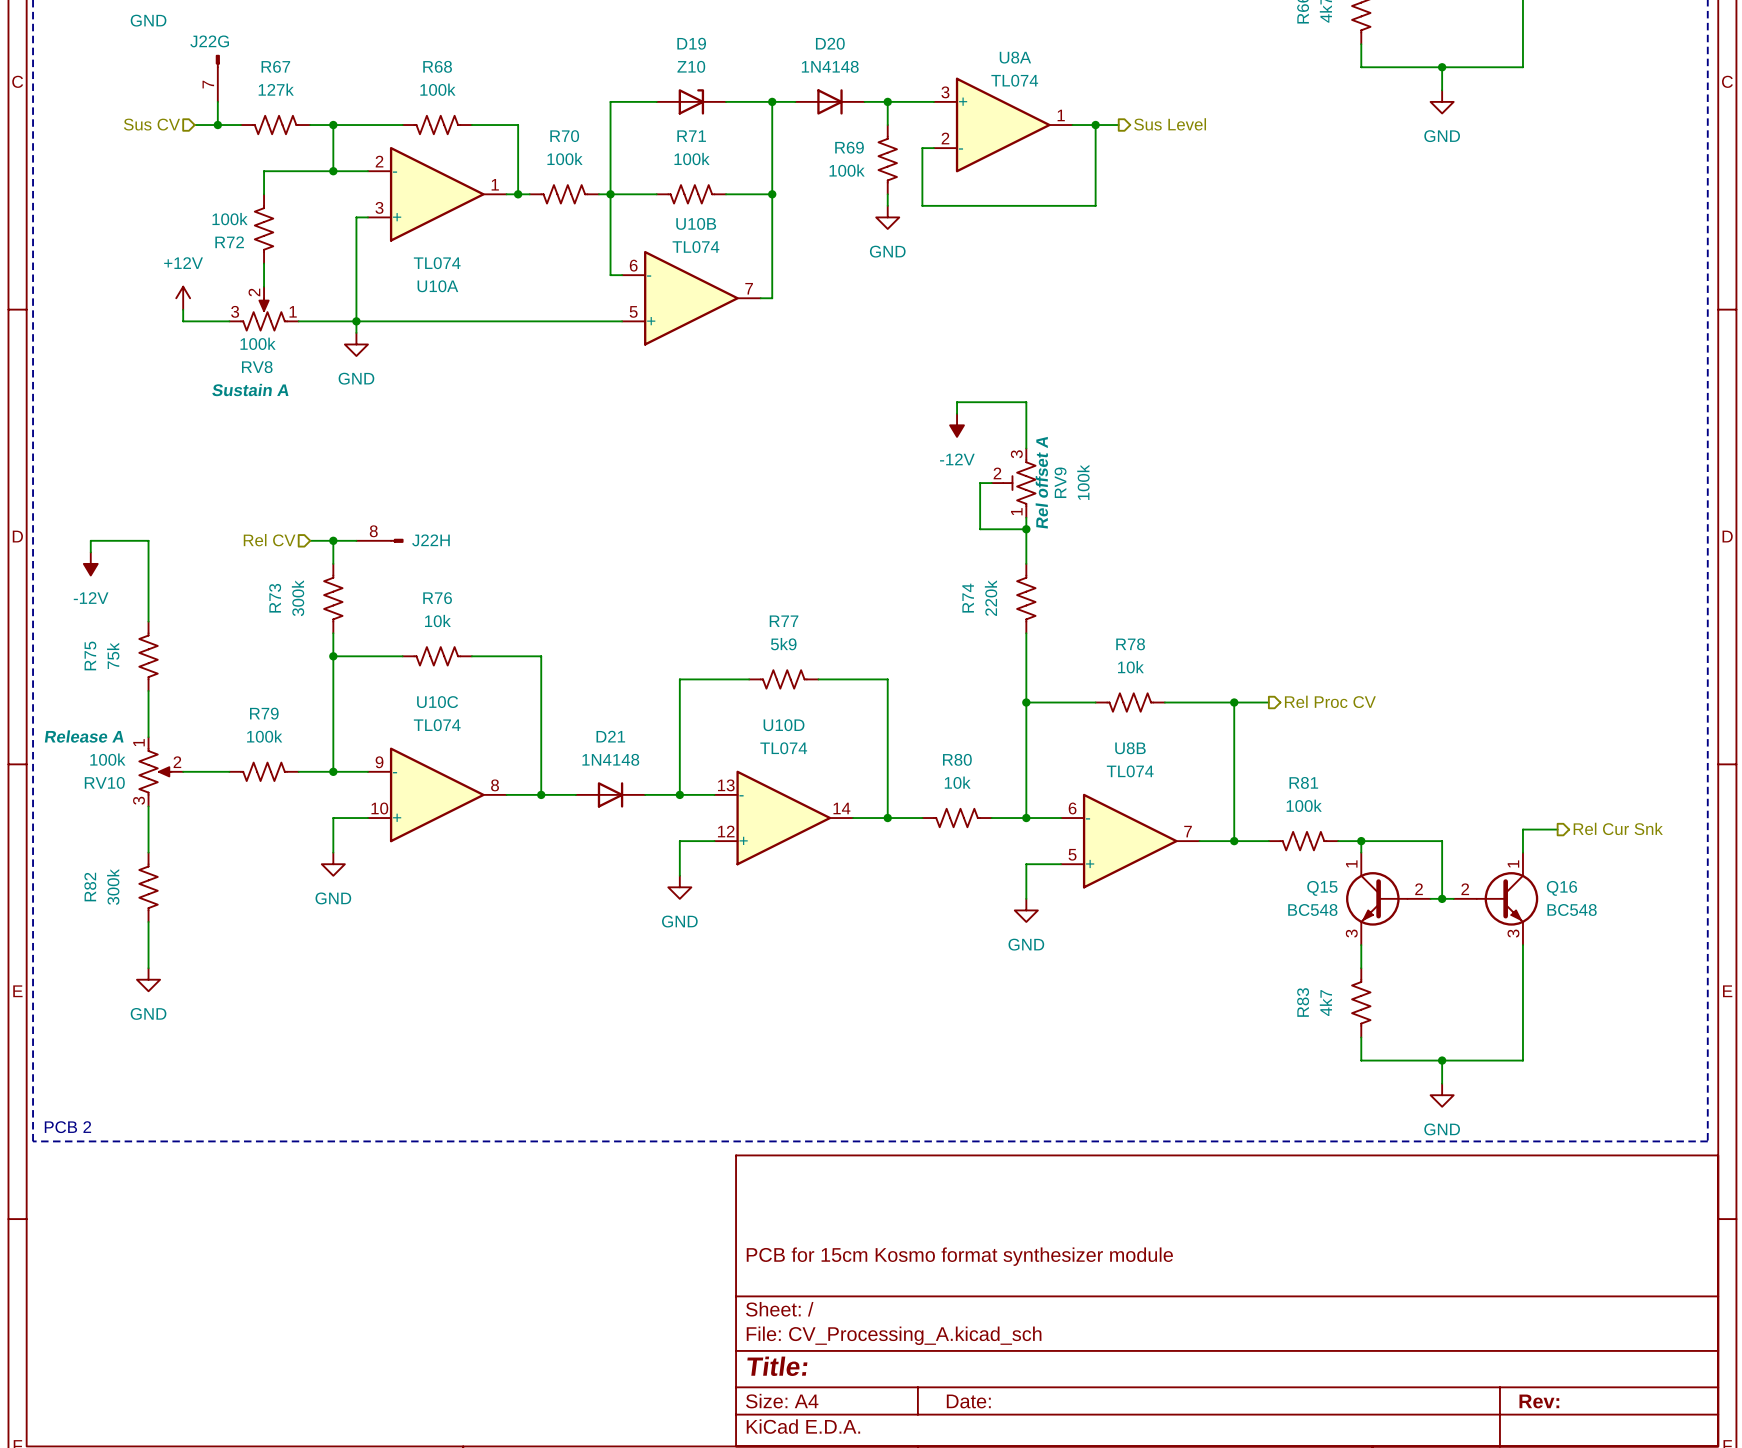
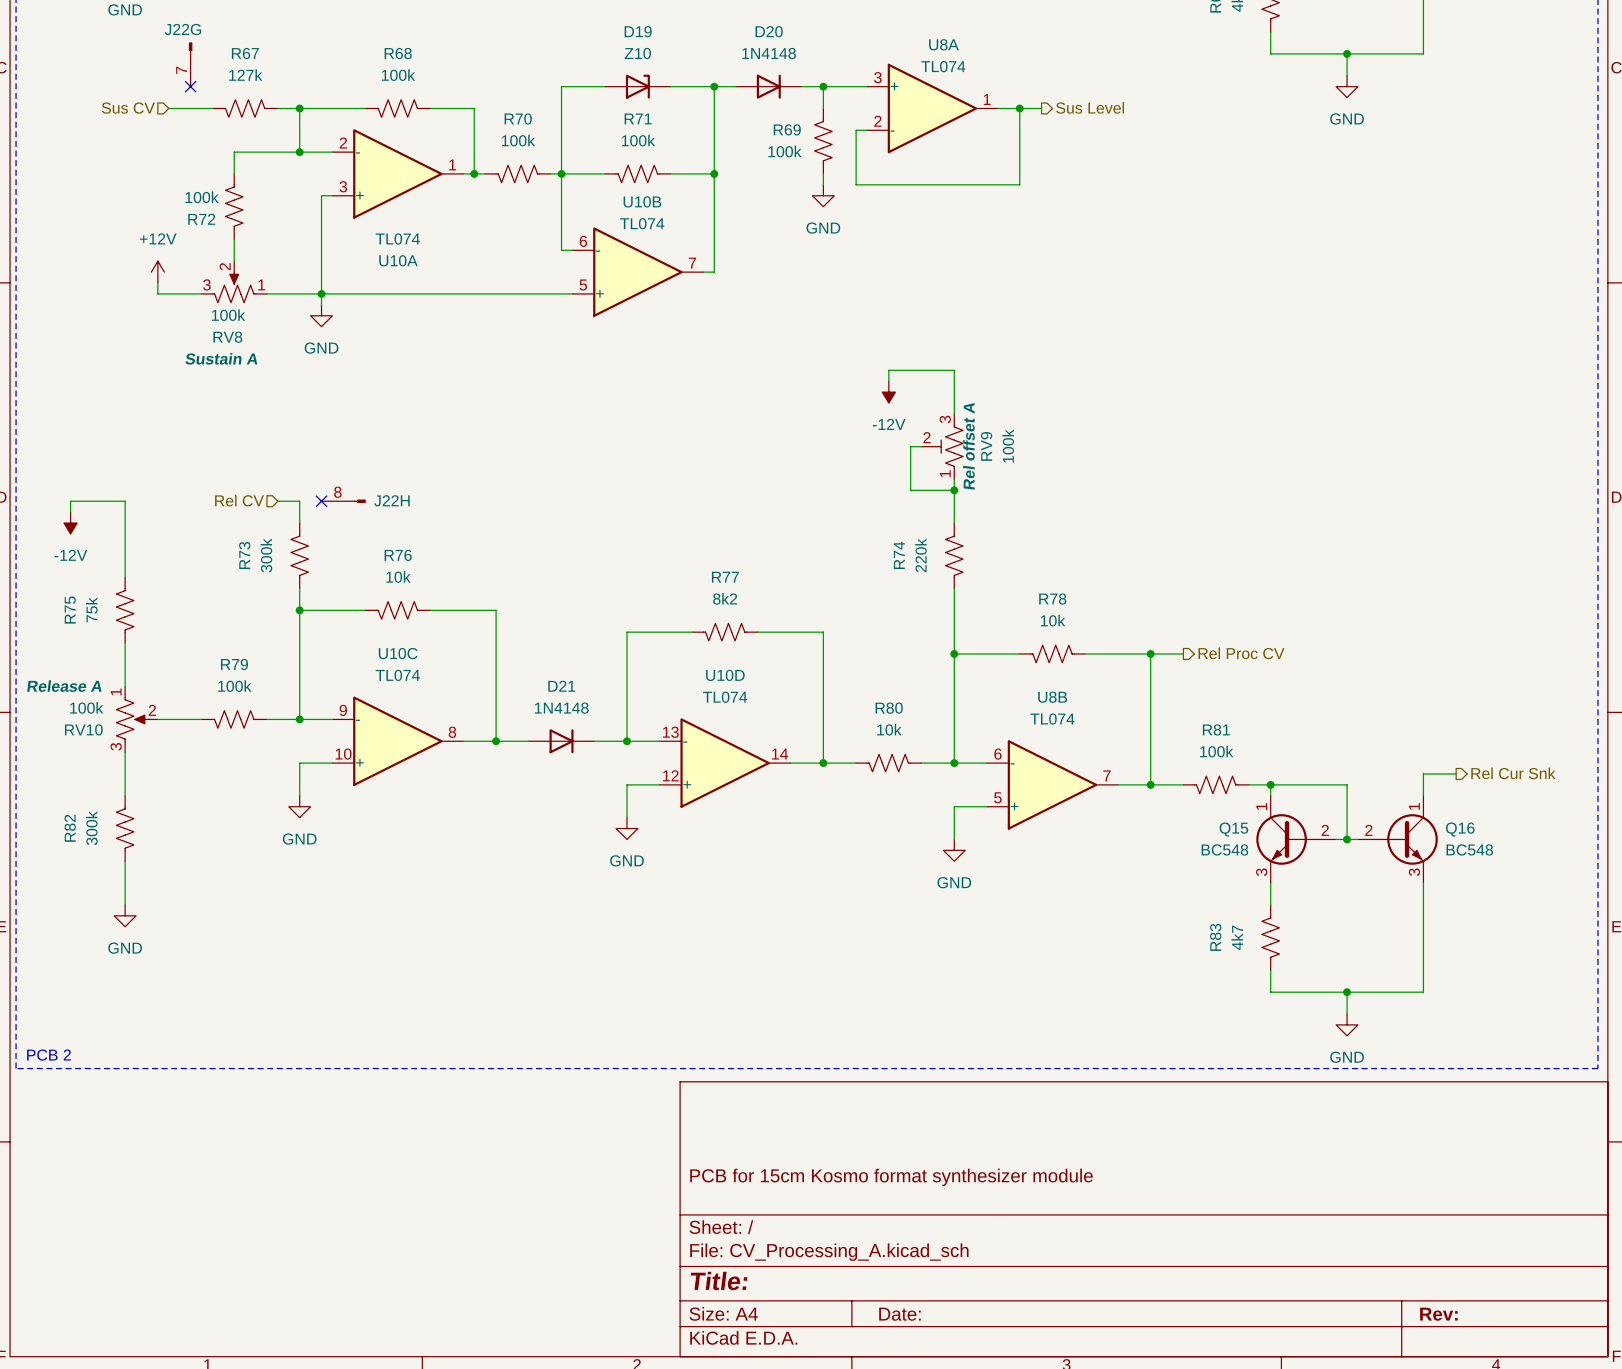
wire: (217, 101) (217, 125) -> none
no-connect mark: none -> (190, 86)
junction: (217, 125) -> none
wire: (333, 540) (356, 540) -> none
junction: (333, 540) -> none
no-connect mark: none -> (321, 501)
R77 value: 5k9 (783, 644) -> 8k2 (725, 598)

